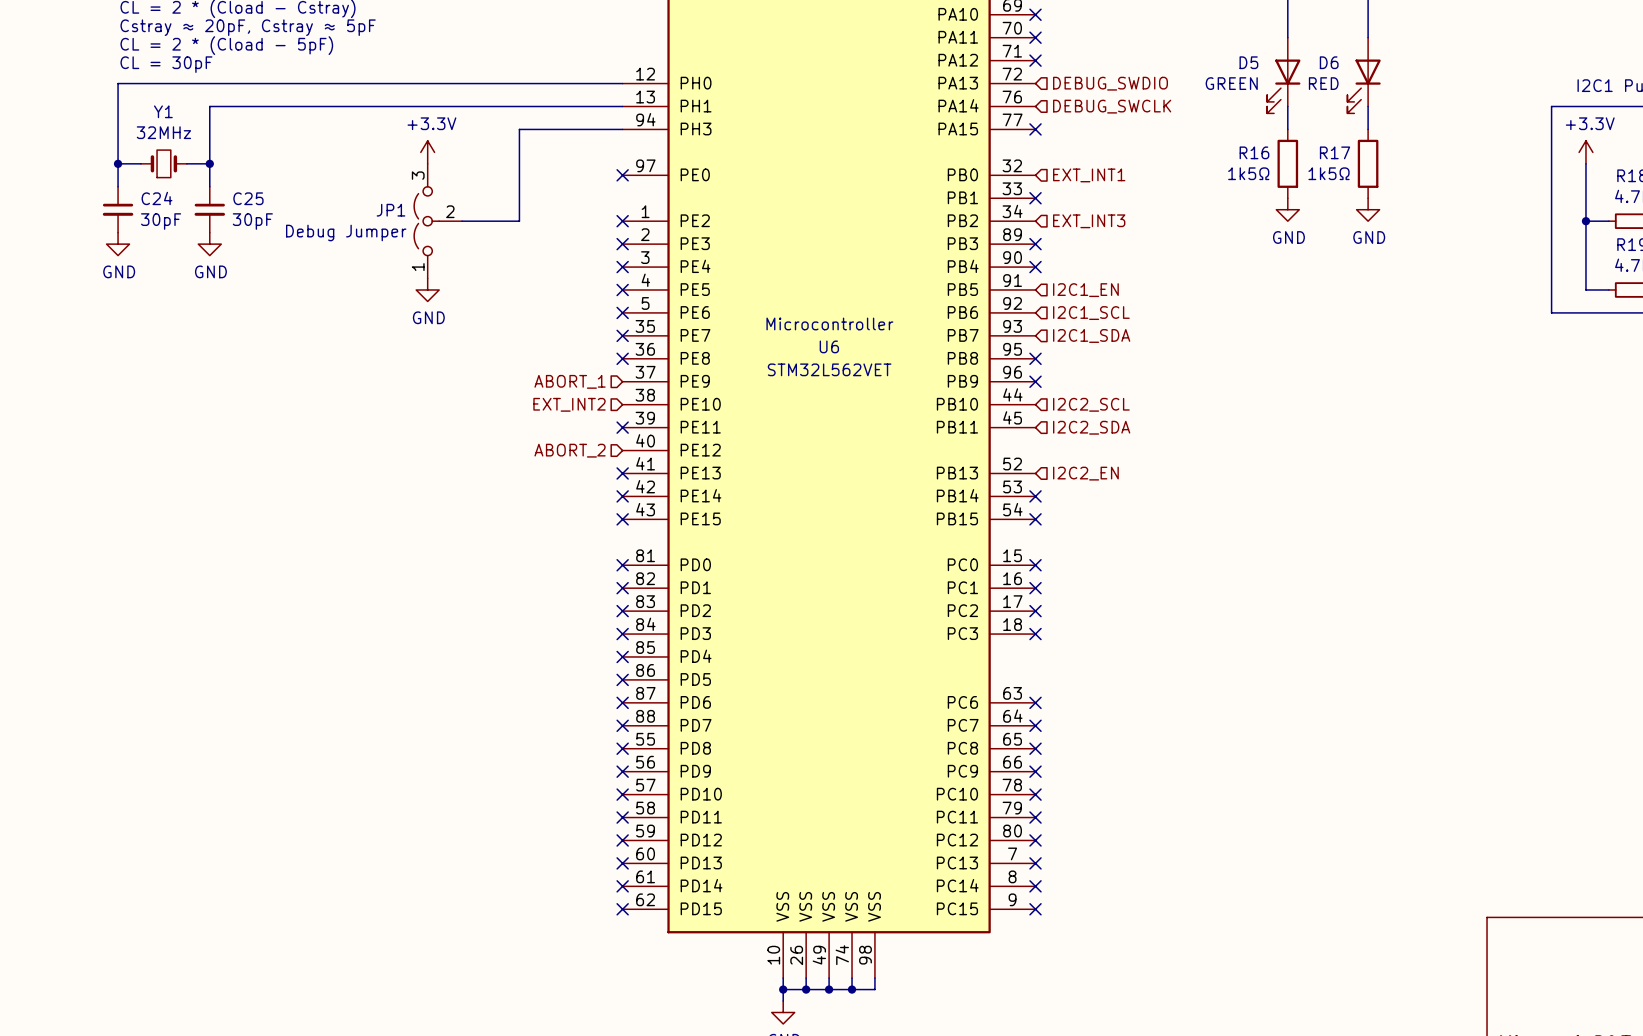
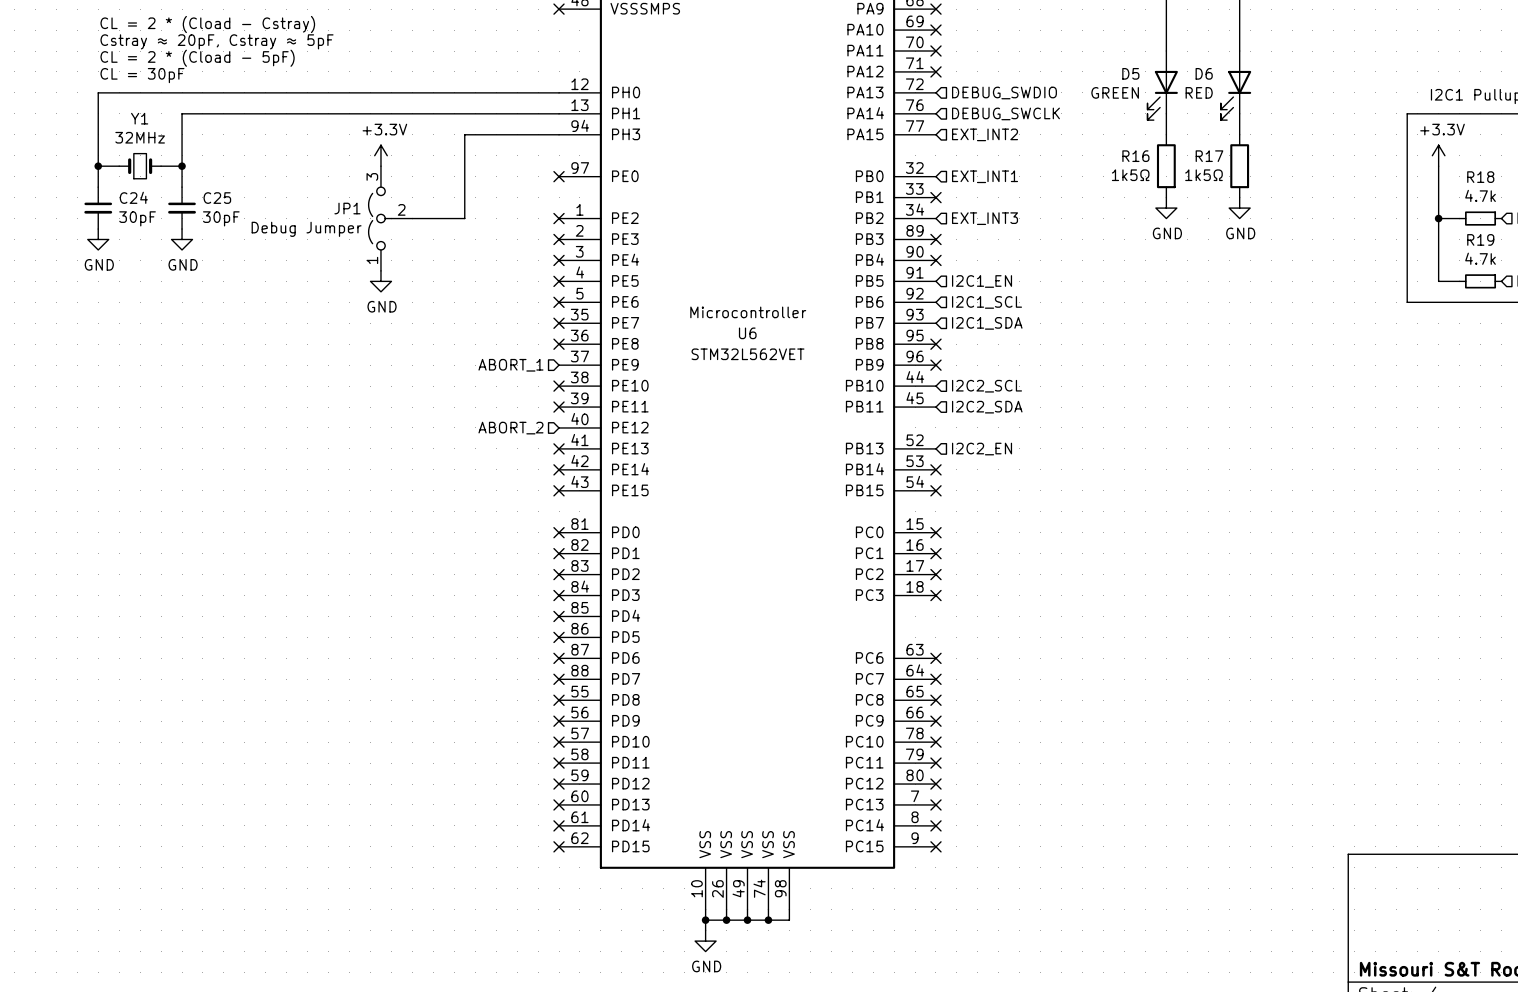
no-connect mark: (1035, 129) -> none
hierarchical label: none -> EXT_INT2 (985, 134)
hierarchical label: EXT_INT2 (569, 404) -> none
no-connect mark: none -> (559, 386)

